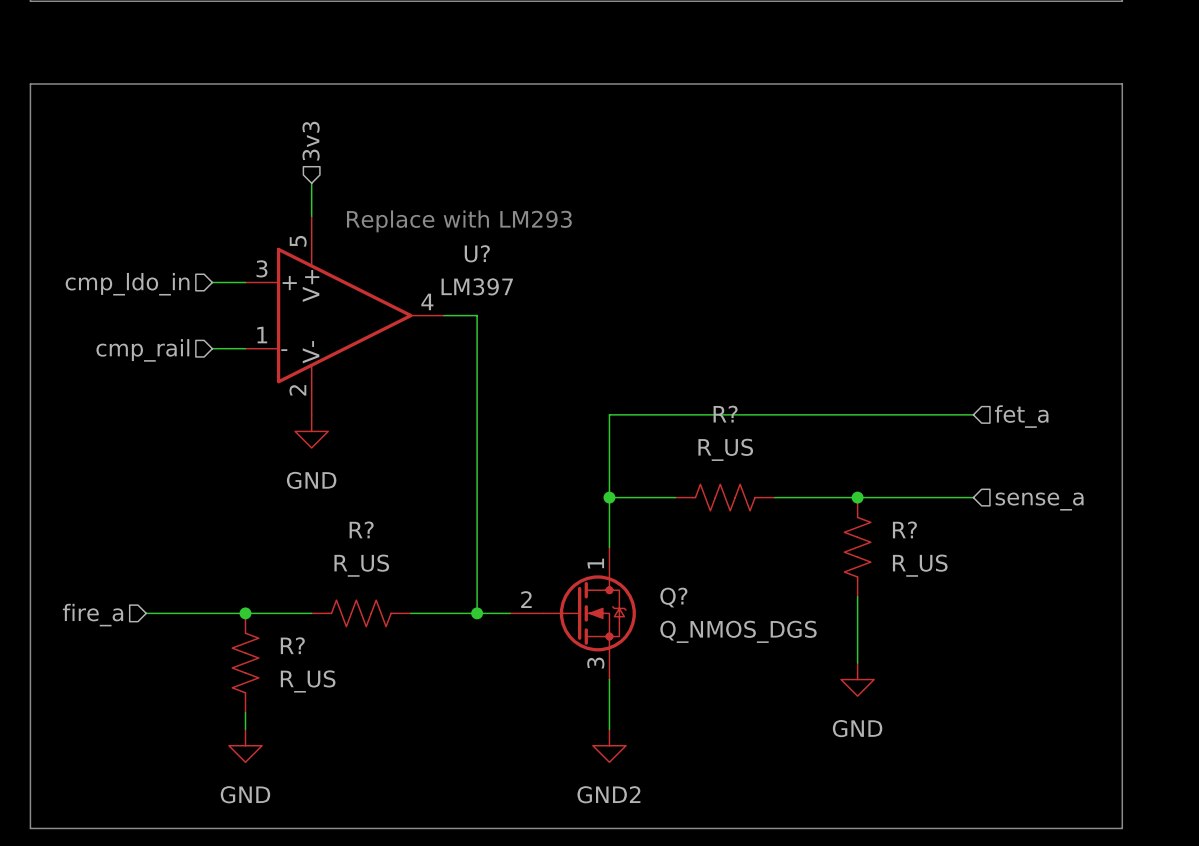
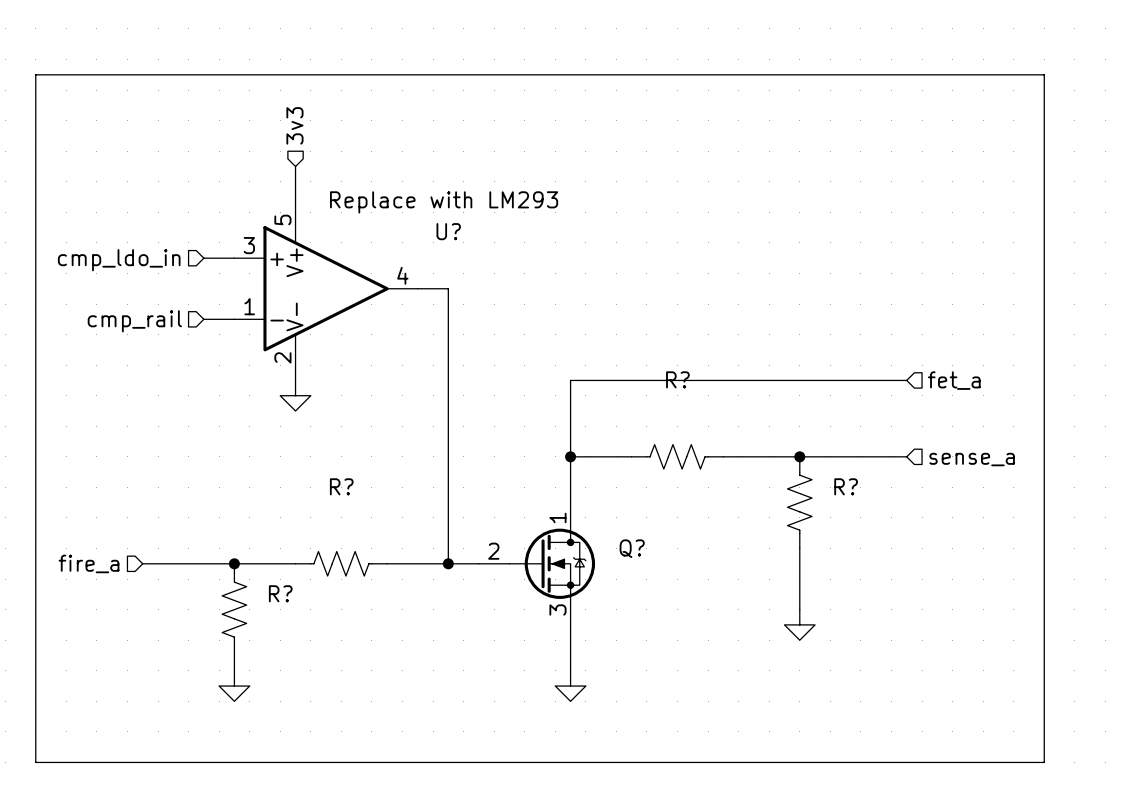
U? value: LM397 (477, 286) -> none
R? value: R_US (725, 449) -> none
power symbol text: GND (311, 480) -> none
R? value: R_US (361, 565) -> none
R? value: R_US (920, 565) -> none
Q? value: Q_NMOS_DGS (738, 631) -> none
R? value: R_US (308, 681) -> none
power symbol text: GND (857, 728) -> none
power symbol text: GND (245, 794) -> none
power symbol text: GND2 (608, 794) -> none

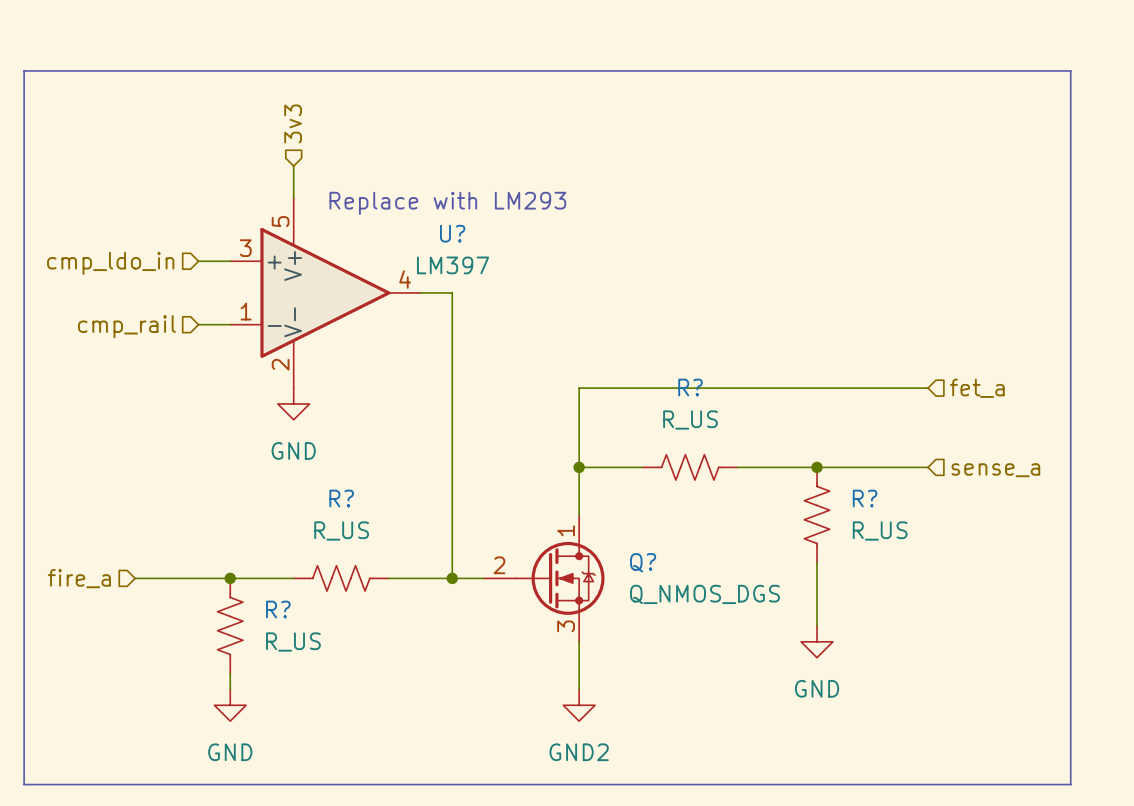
U? value: none -> LM397 (453, 265)
R? value: none -> R_US (690, 419)
power symbol text: none -> GND (293, 450)
R? value: none -> R_US (341, 531)
R? value: none -> R_US (880, 530)
Q? value: none -> Q_NMOS_DGS (704, 594)
R? value: none -> R_US (293, 642)
power symbol text: none -> GND (817, 688)
power symbol text: none -> GND (230, 752)
power symbol text: none -> GND2 (579, 752)

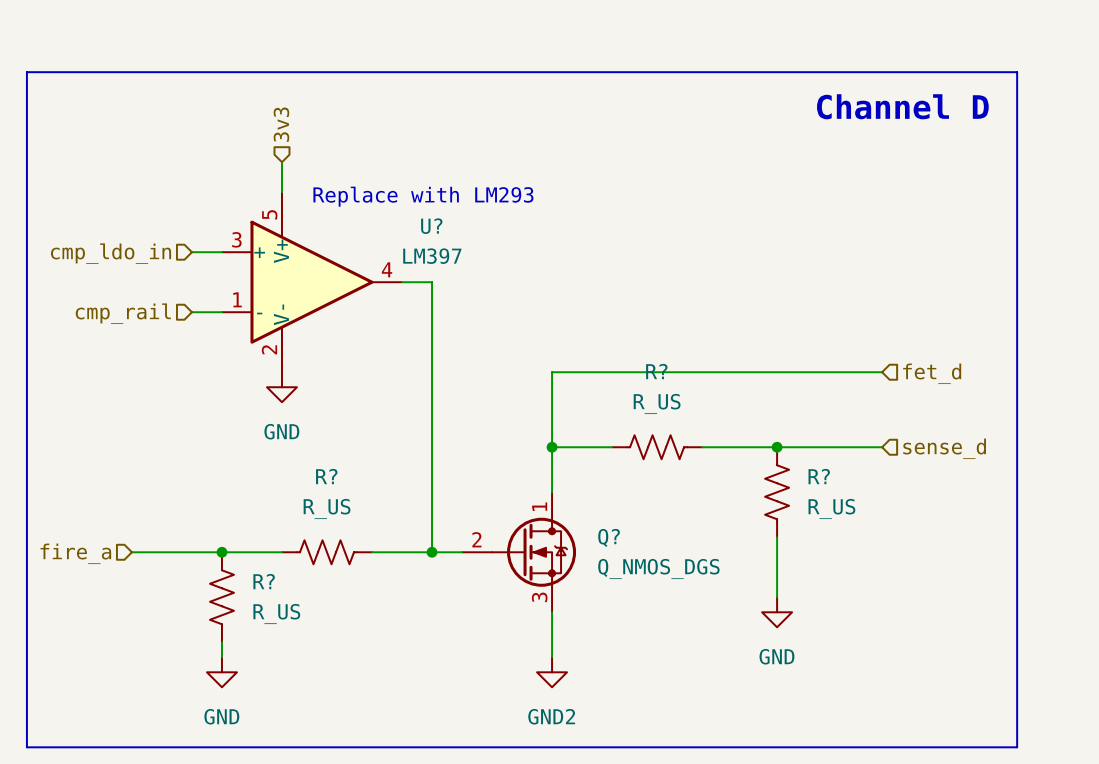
text: none -> Channel D (902, 106)
hierarchical label: fet_a (977, 388) -> fet_d (932, 373)
hierarchical label: sense_a (995, 470) -> sense_d (944, 448)

